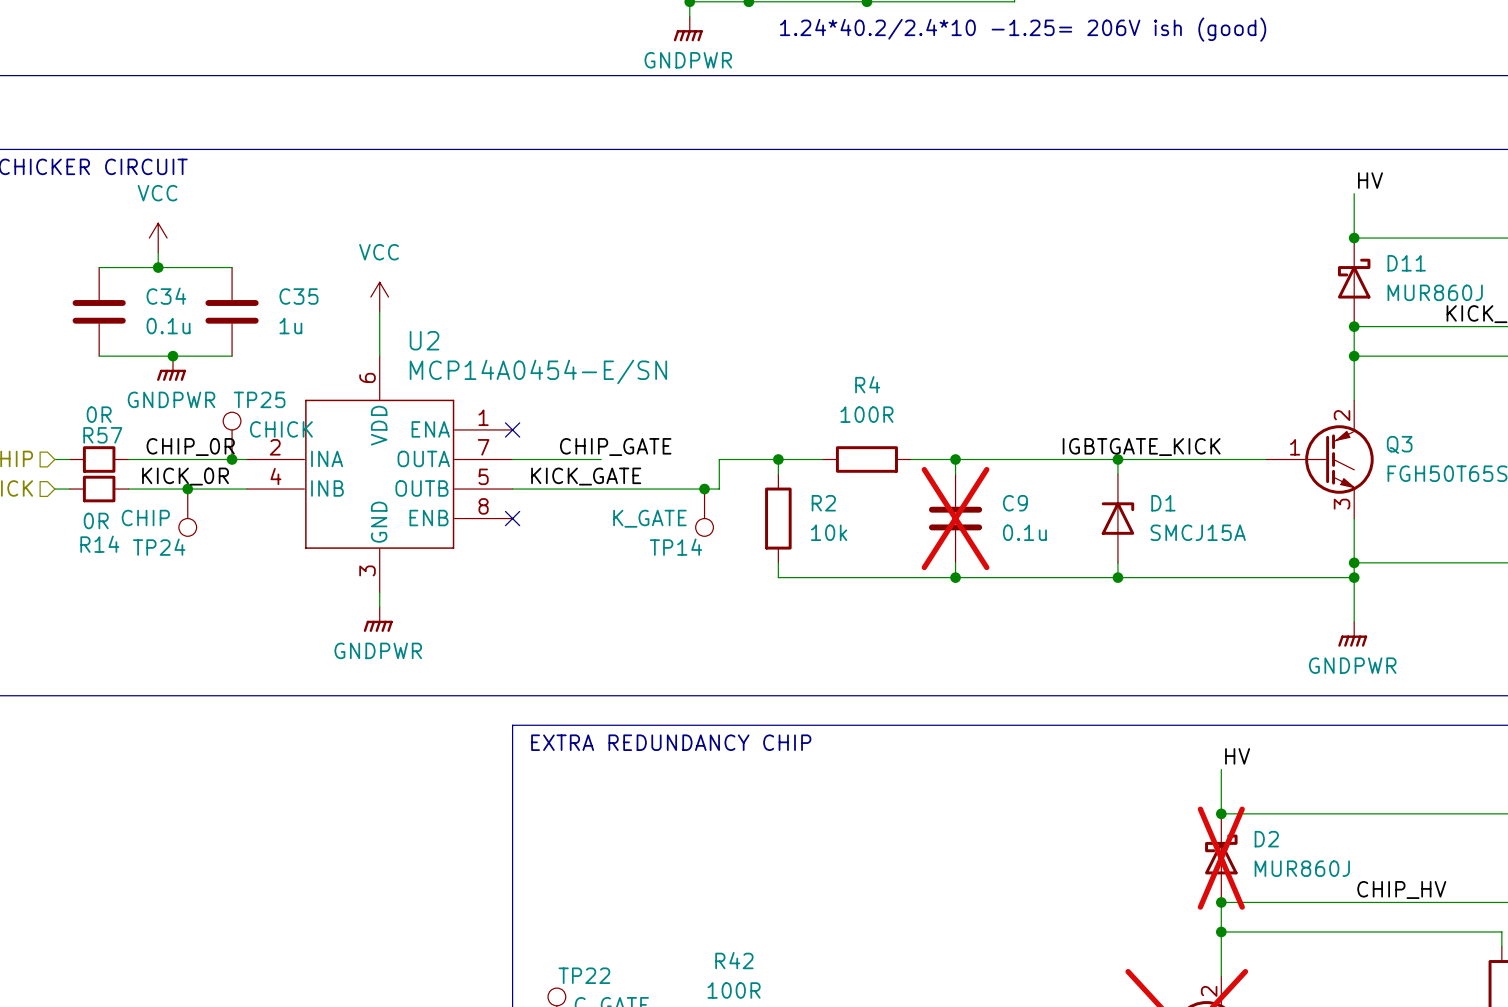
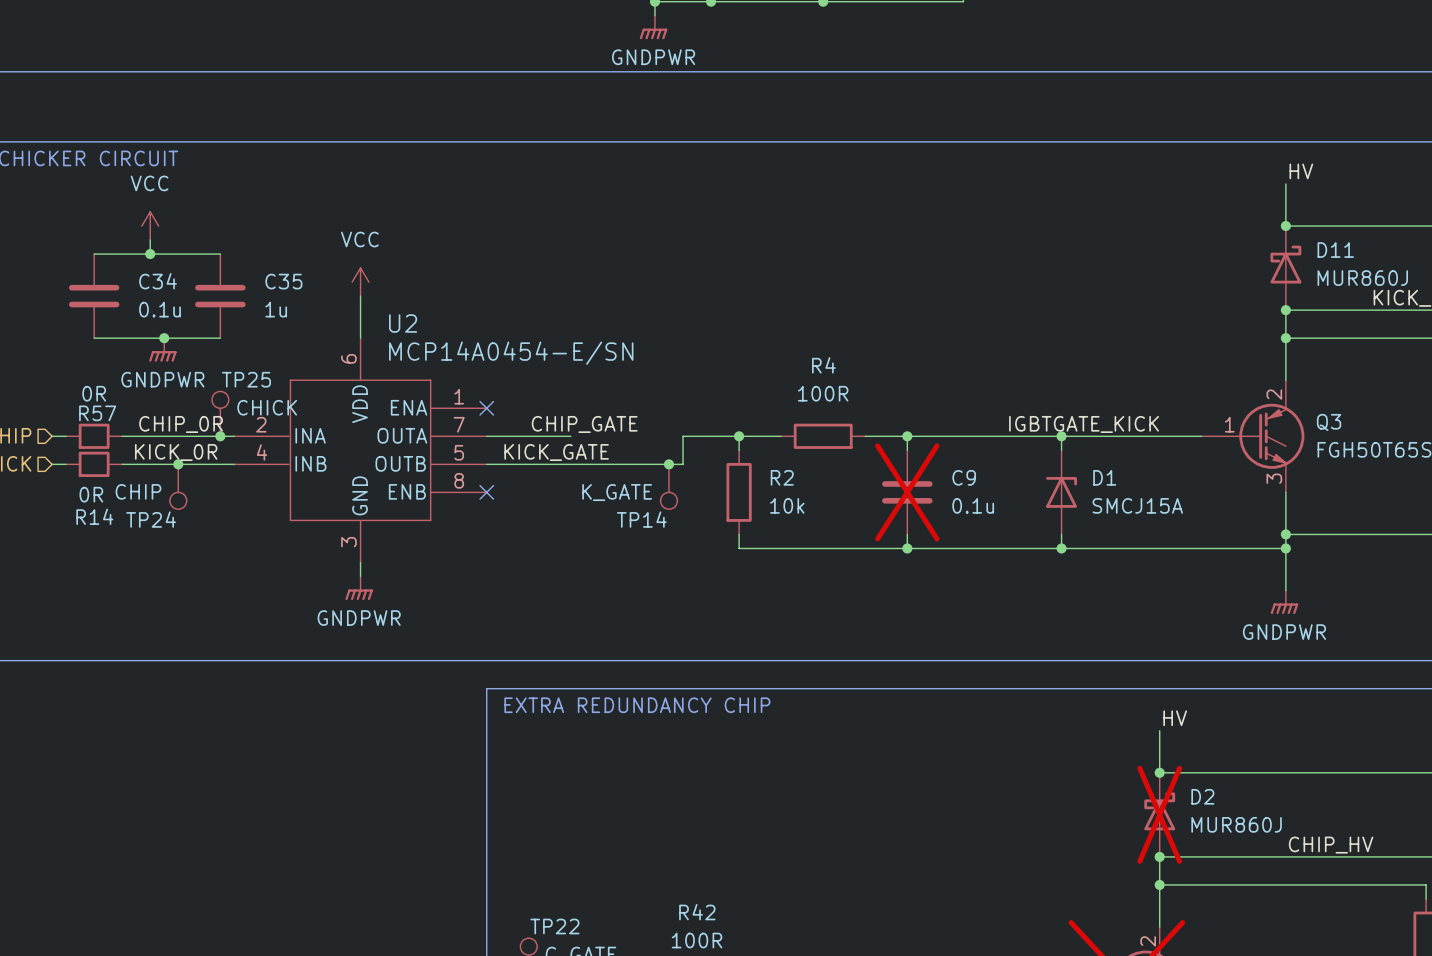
text: 1.24*40.2/2.4*10 -1.25= 206V ish (good) (1023, 29) -> none

